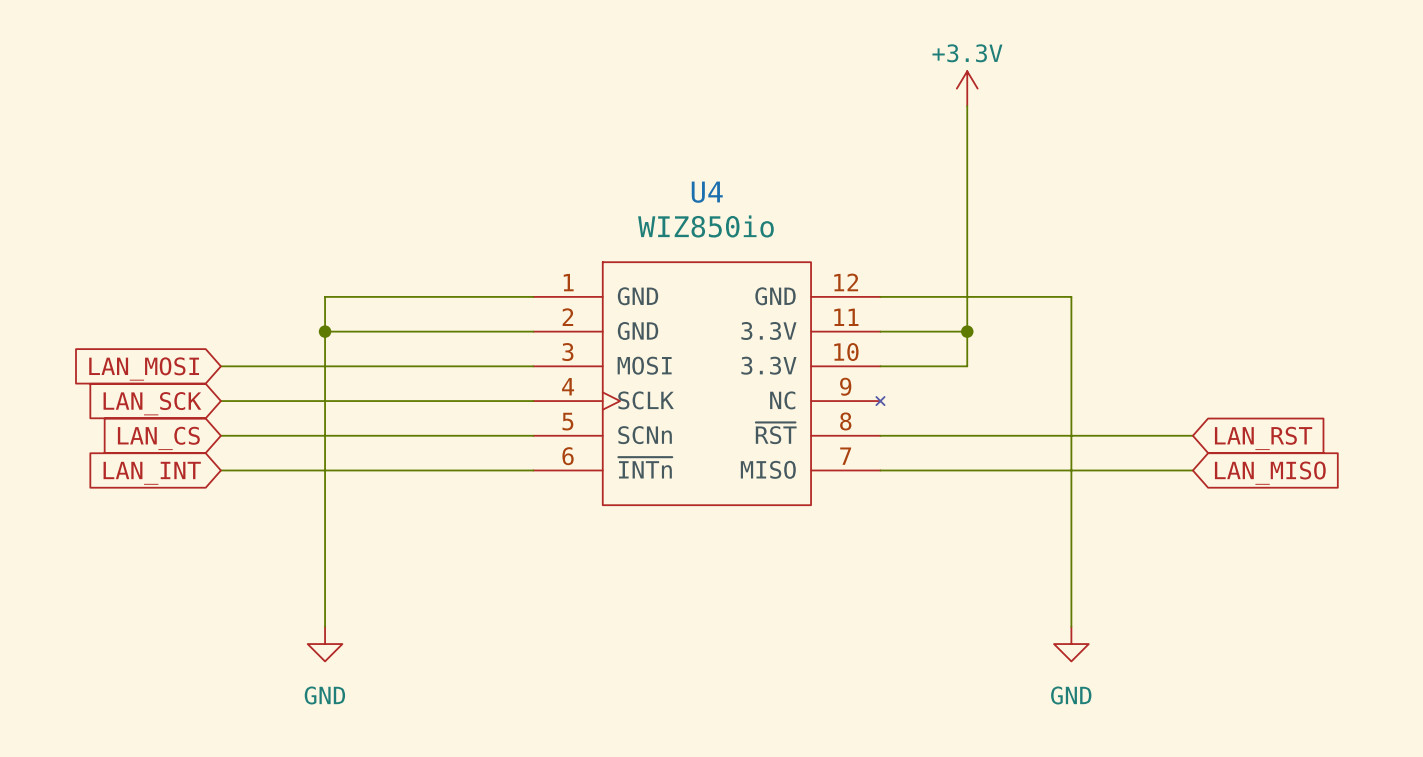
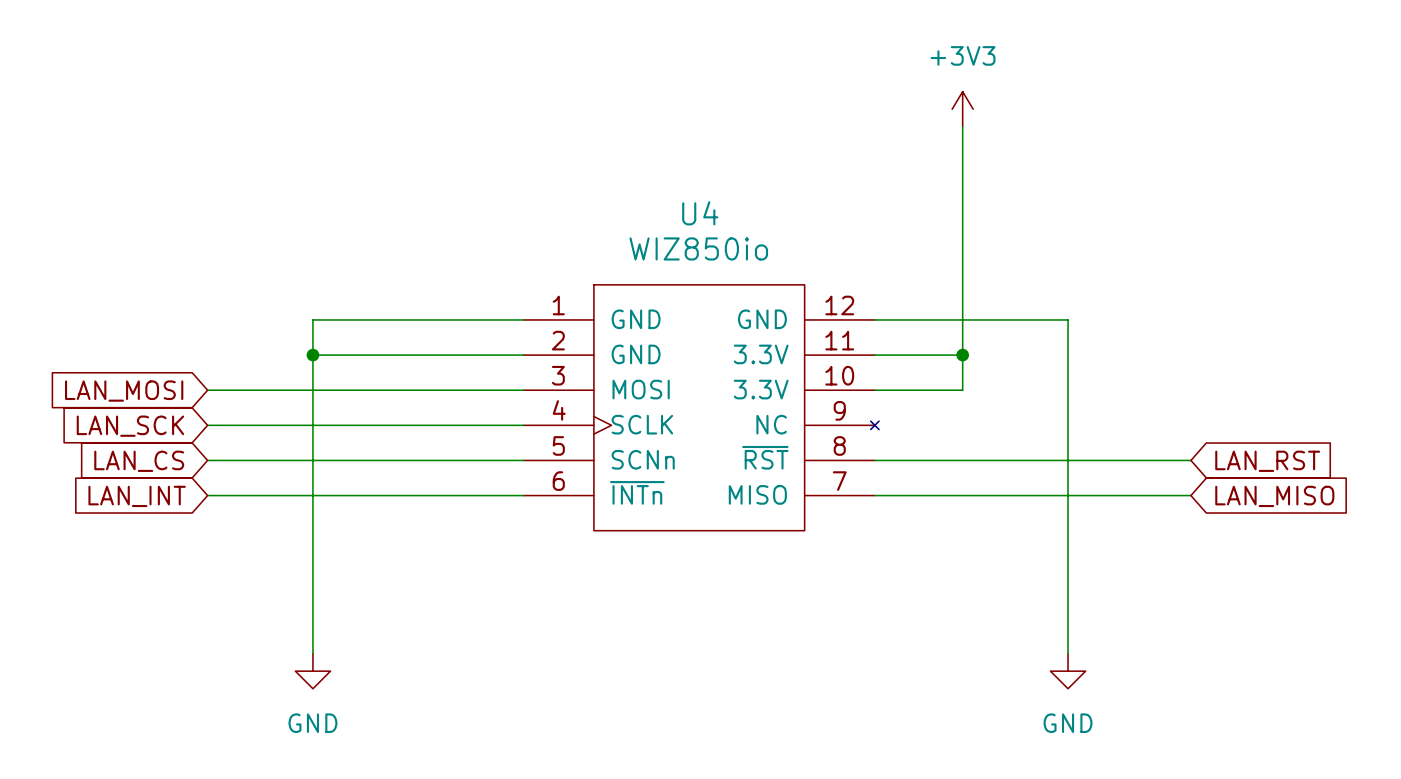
power symbol: +3.3V (967, 88) -> +3V3 (962, 109)

